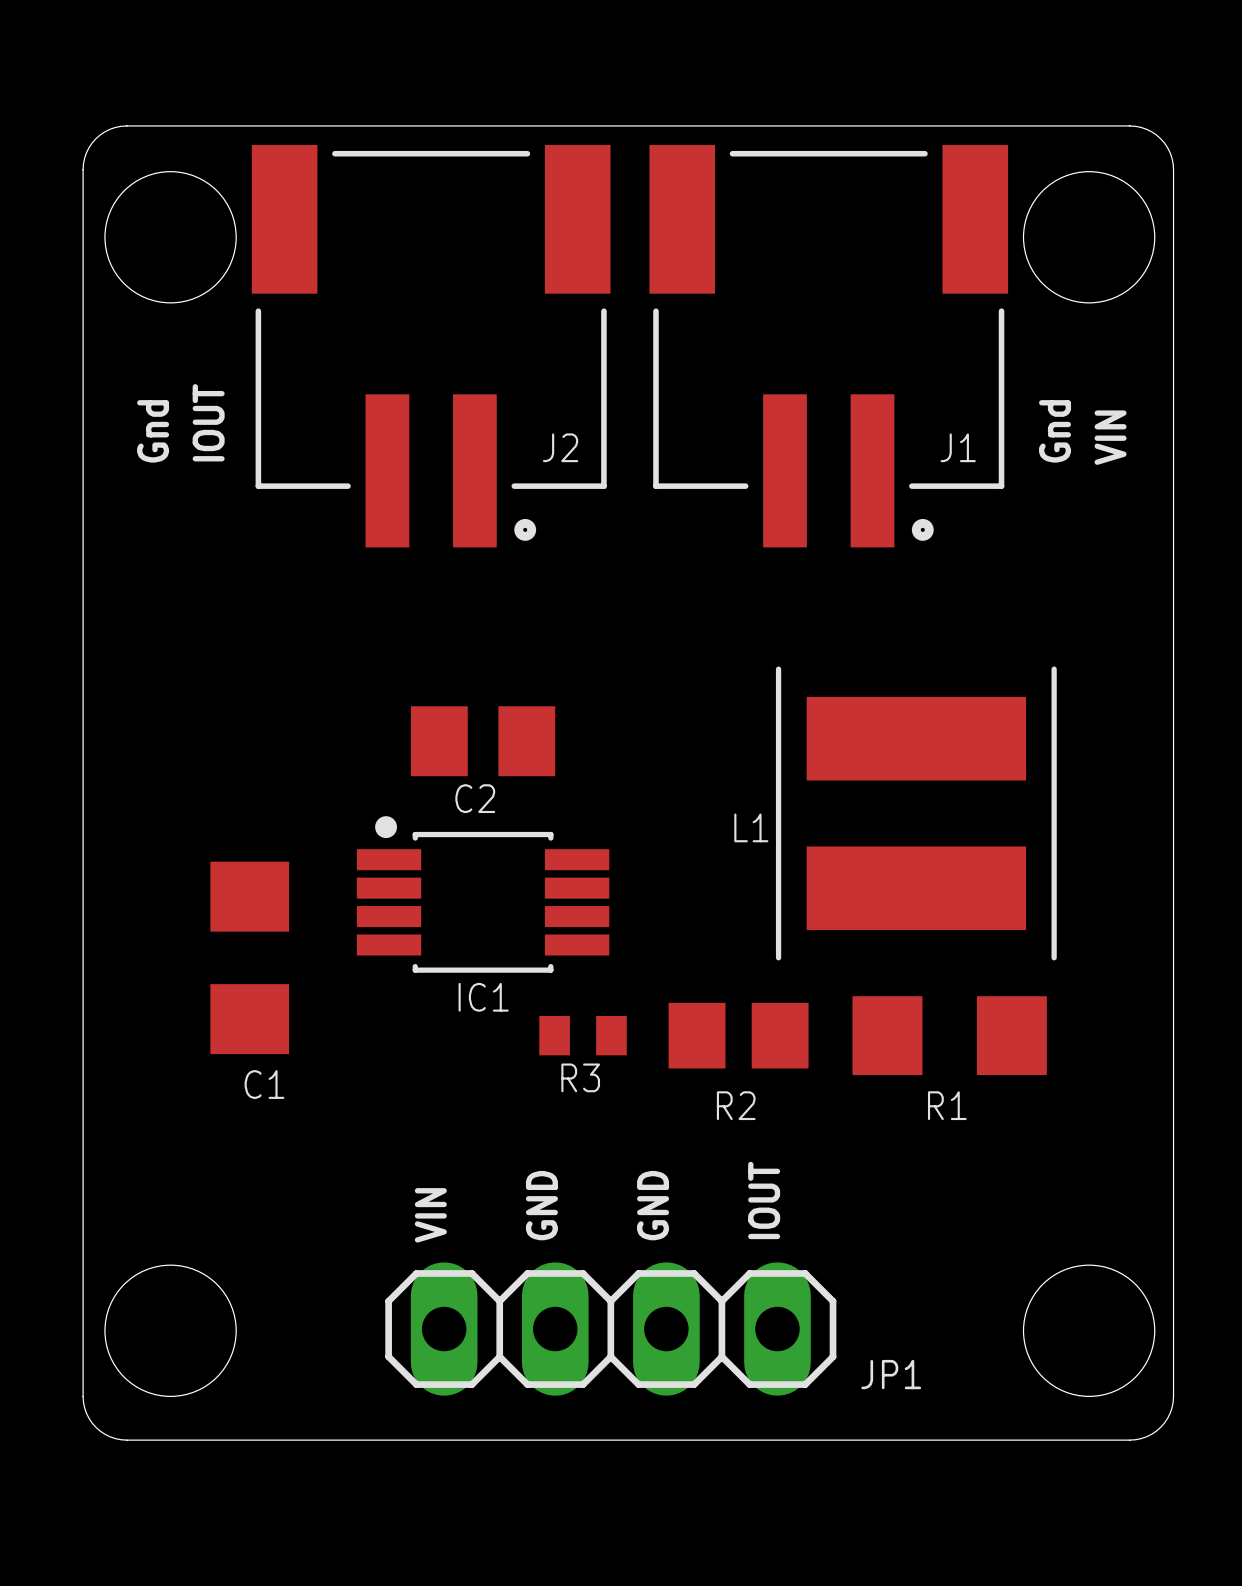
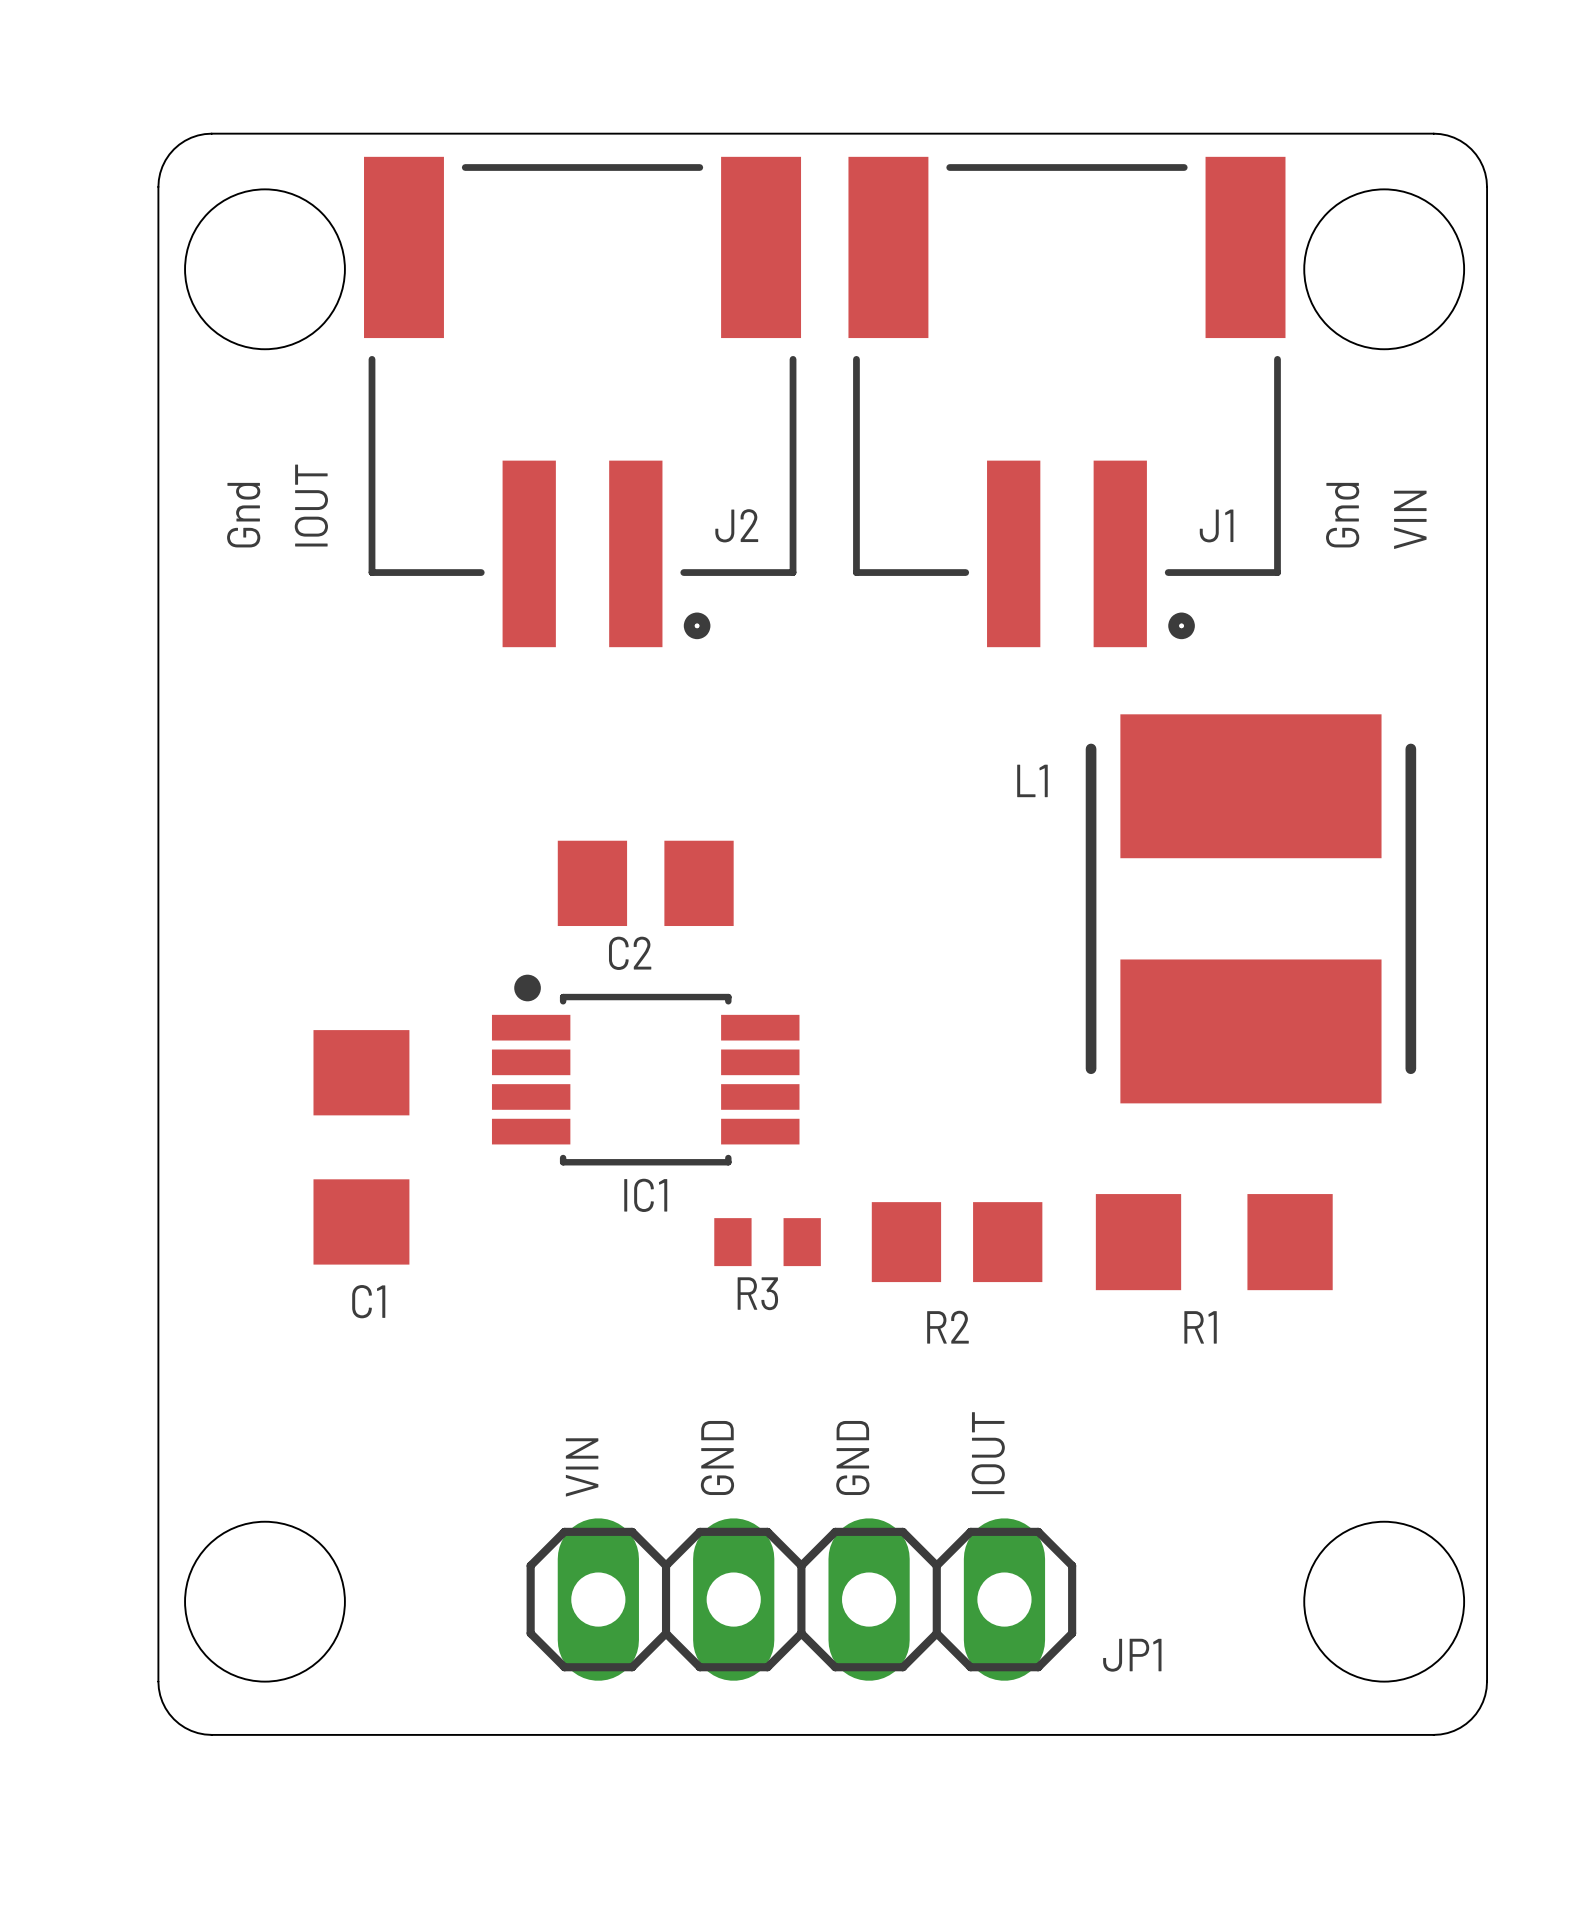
L1 footprint: [775, 666, 1057, 961] -> [1085, 714, 1417, 1104]
L1 name position: L1 (751, 827) -> L1 (1032, 780)

